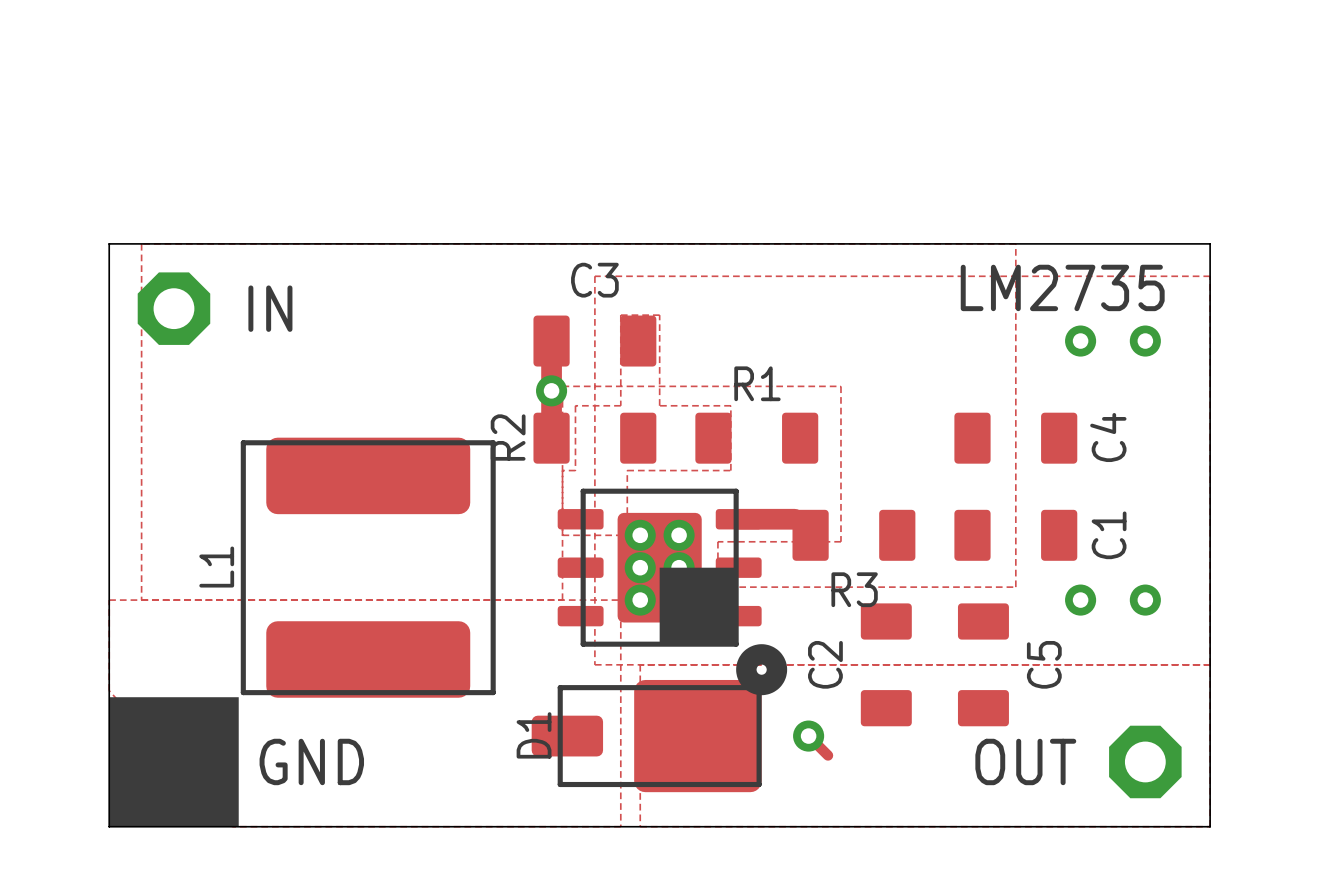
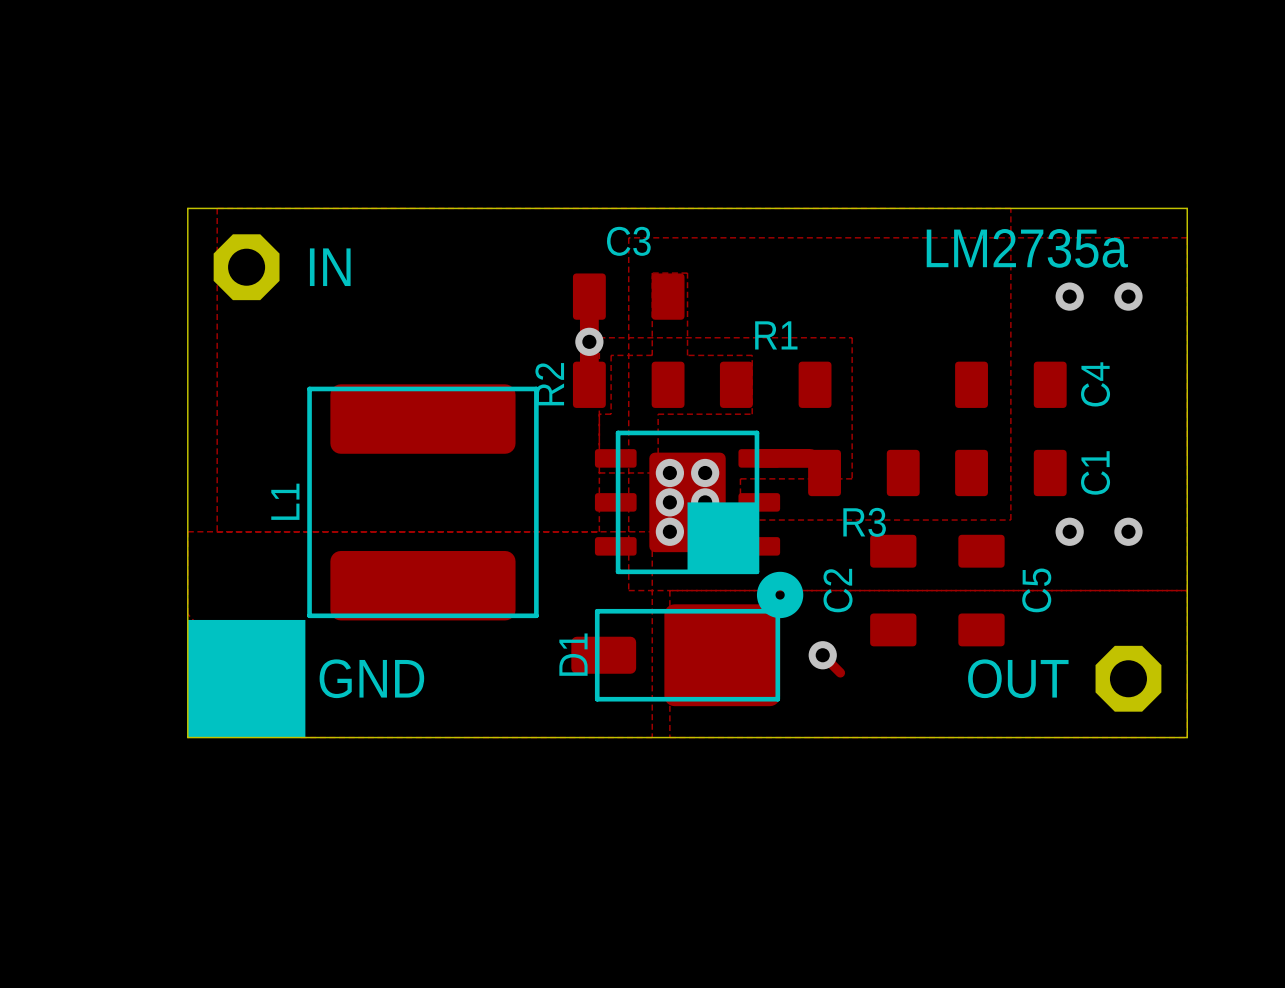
text: LM2735 (1062, 287) -> LM2735a (1027, 248)

